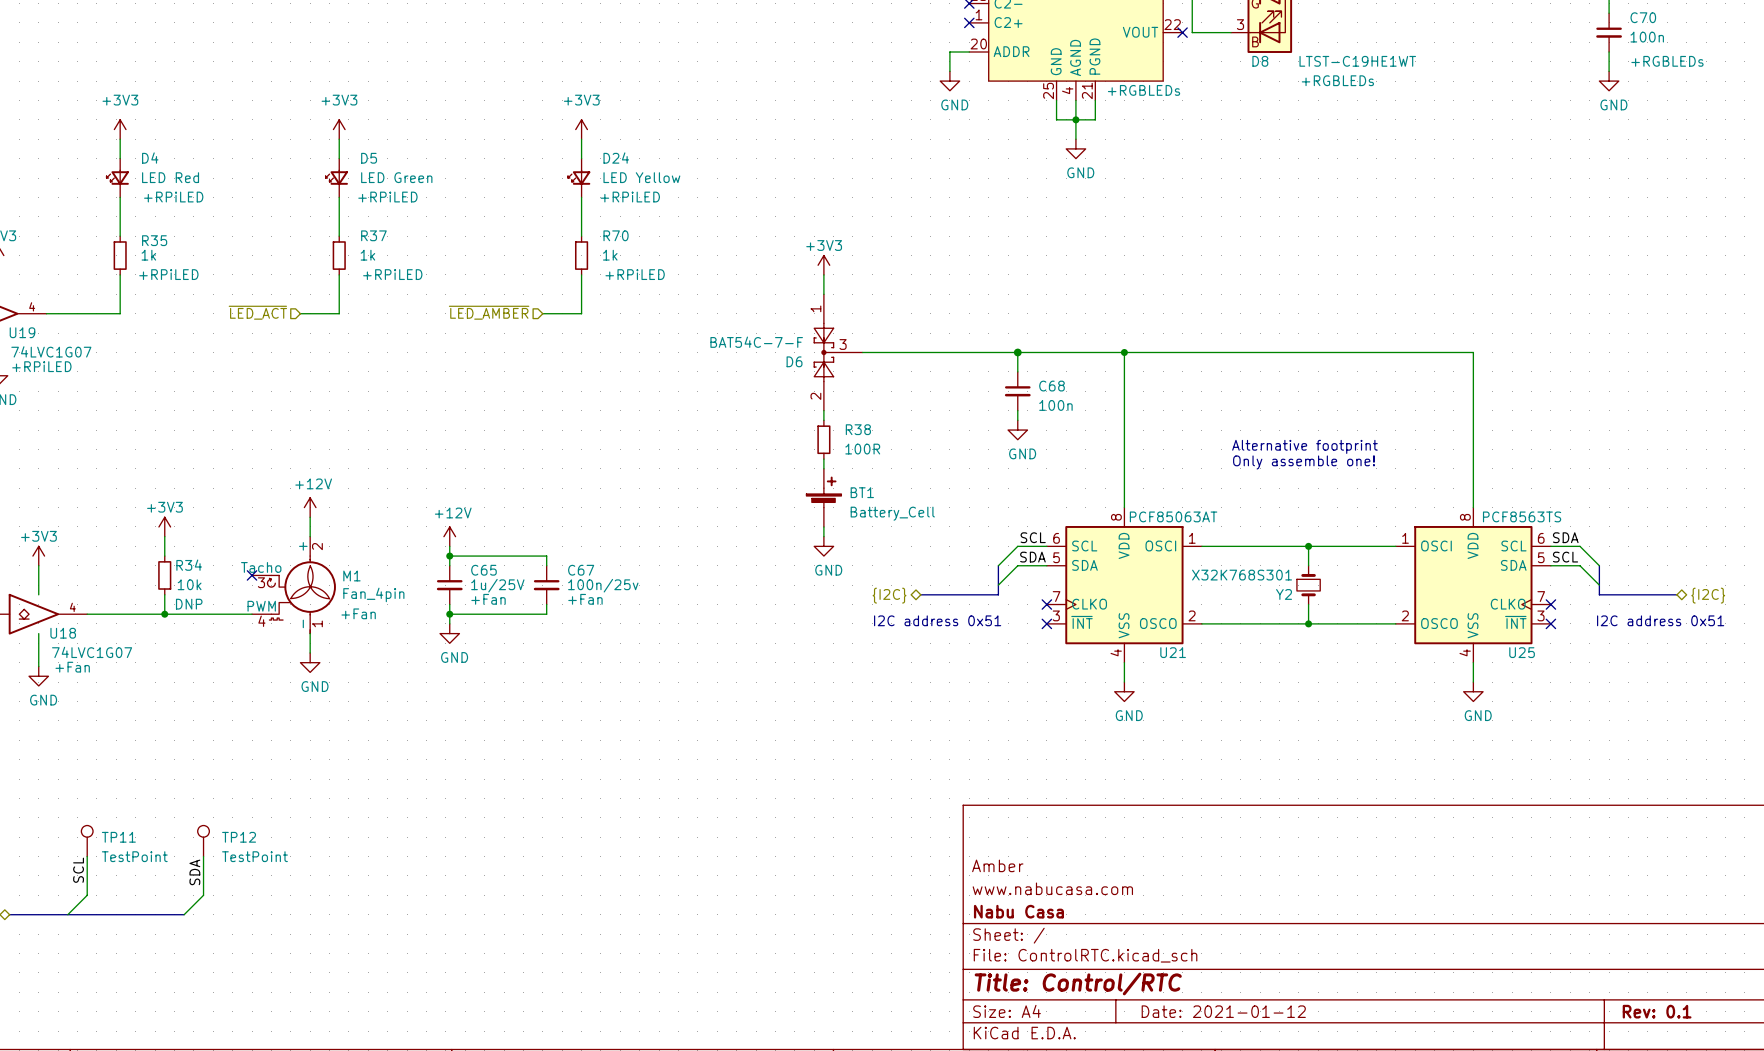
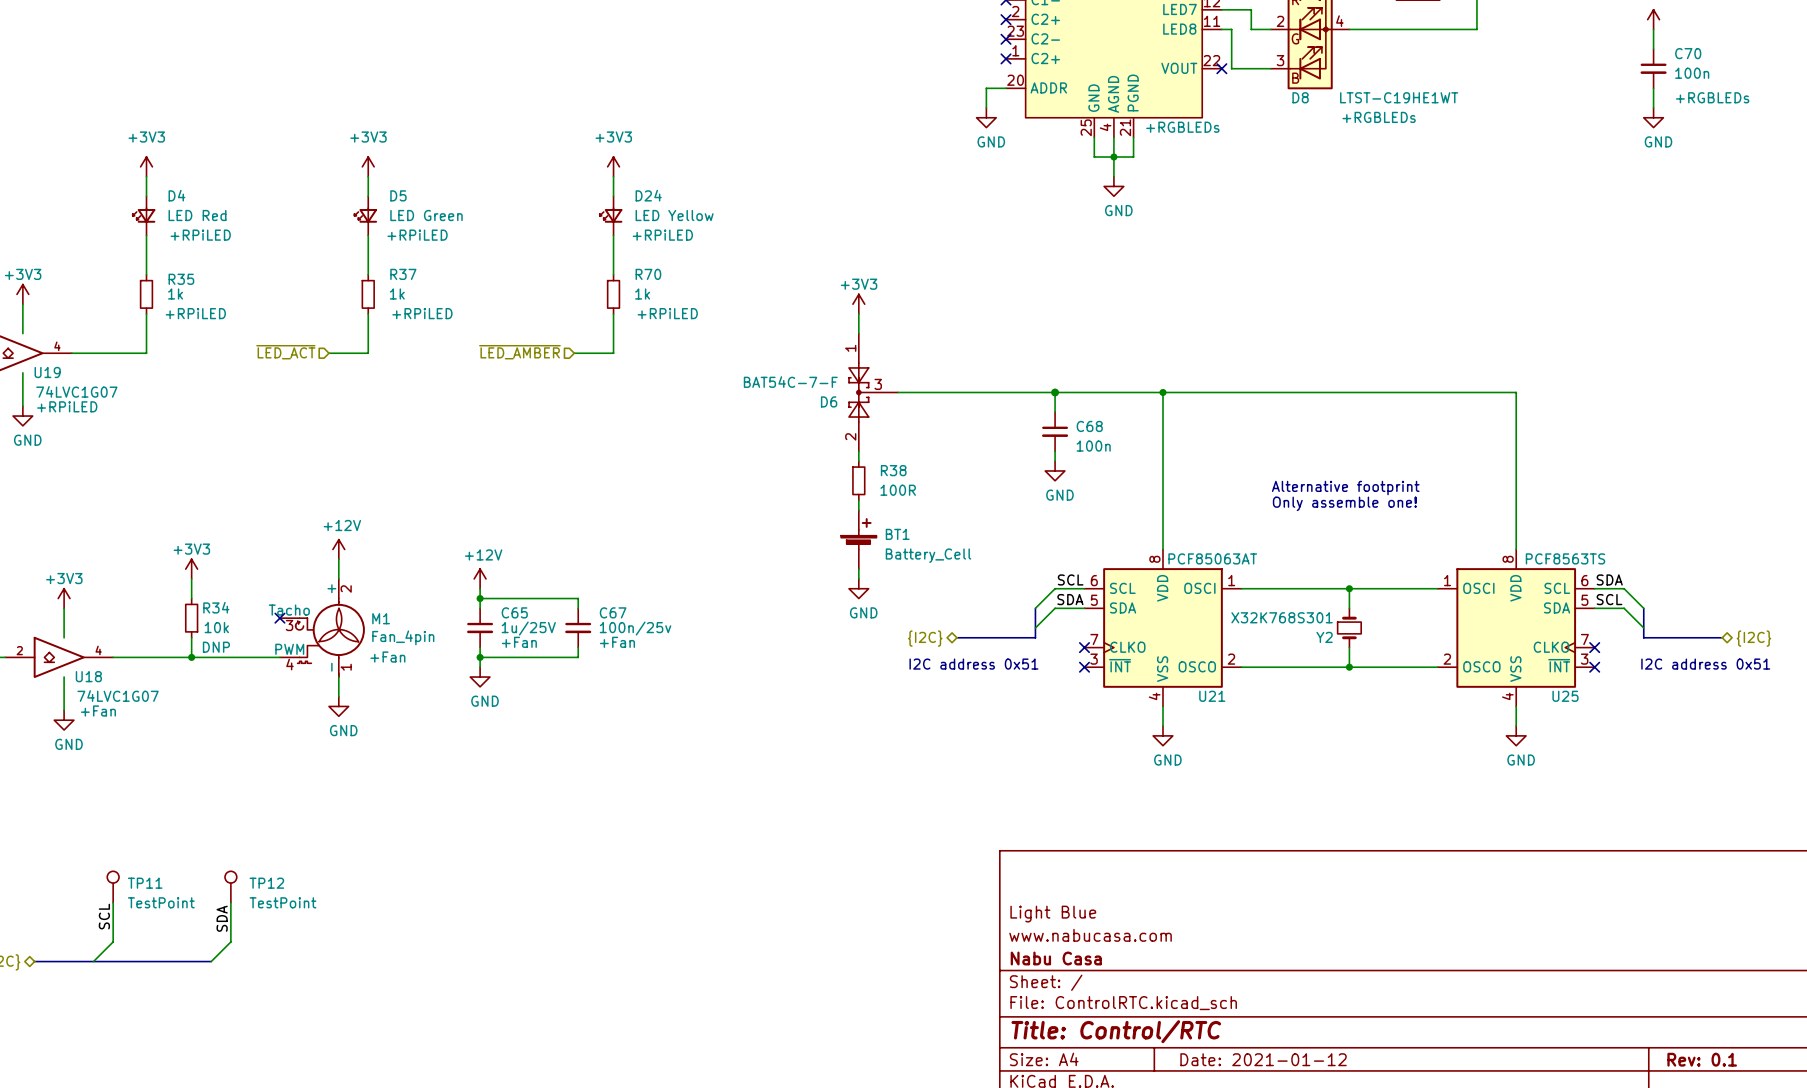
title block: Amber (997, 865) -> Light Blue (1053, 914)

